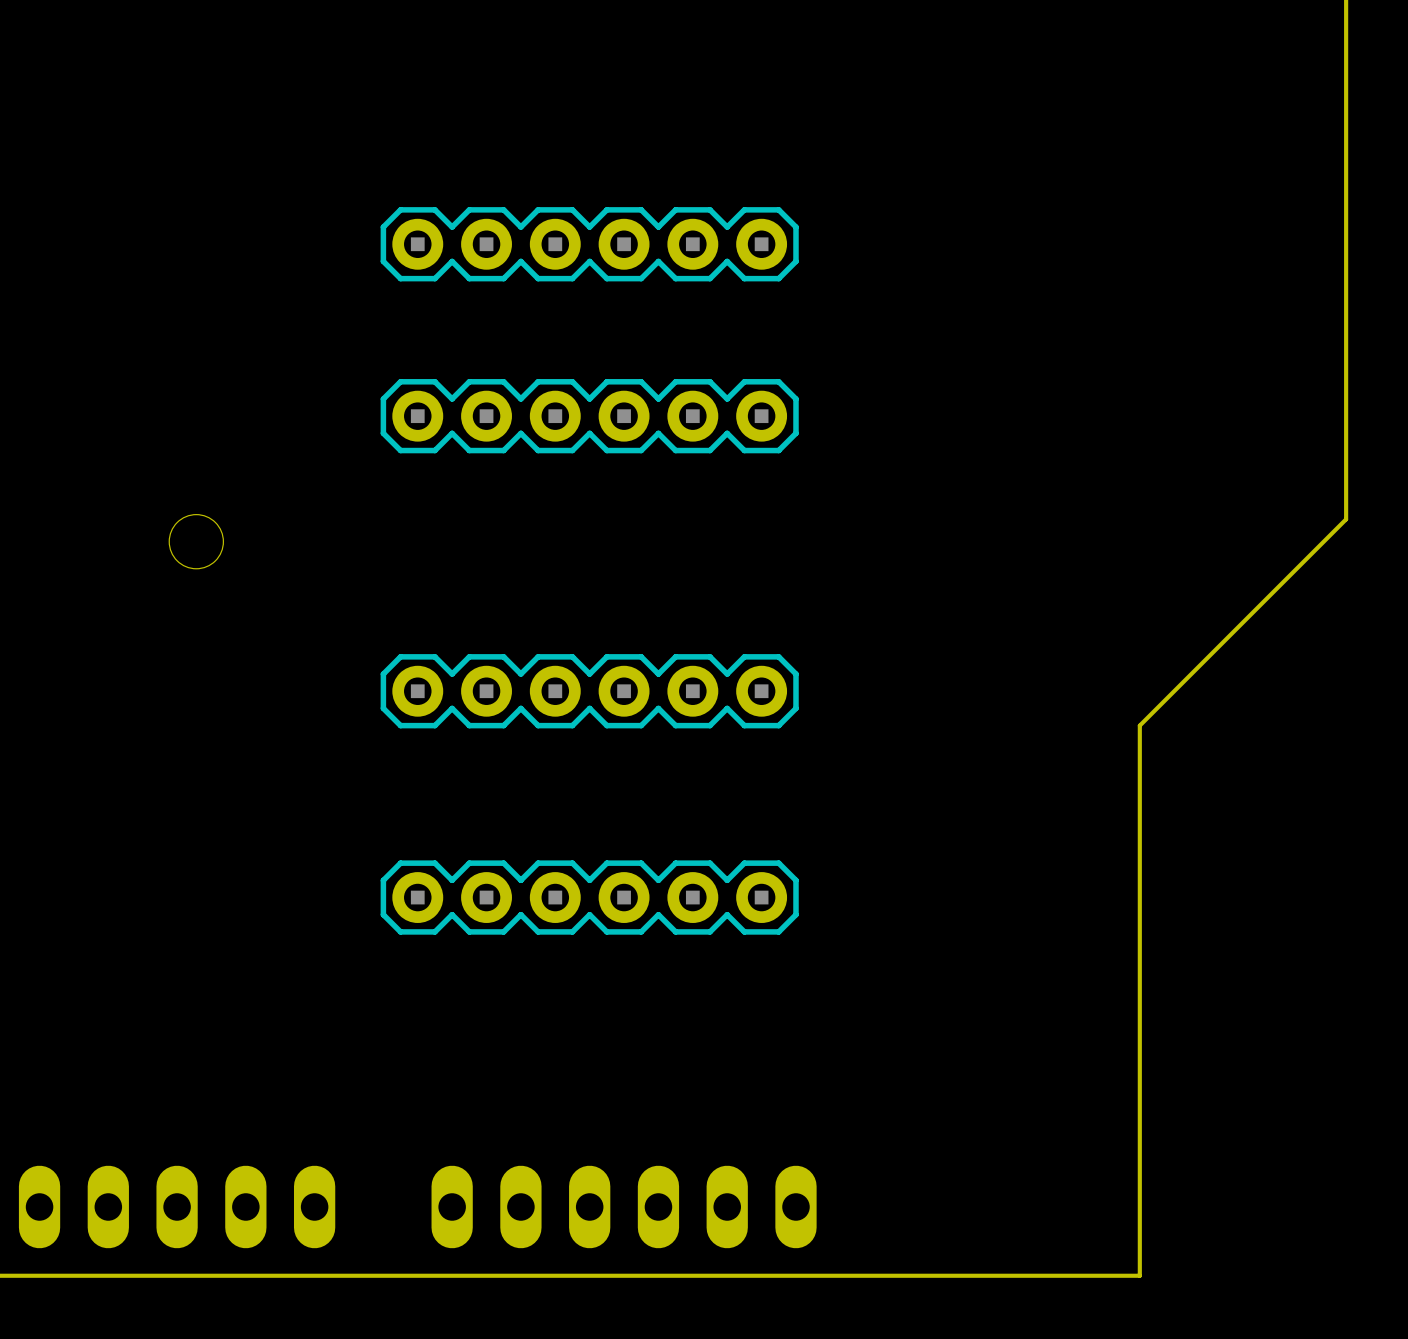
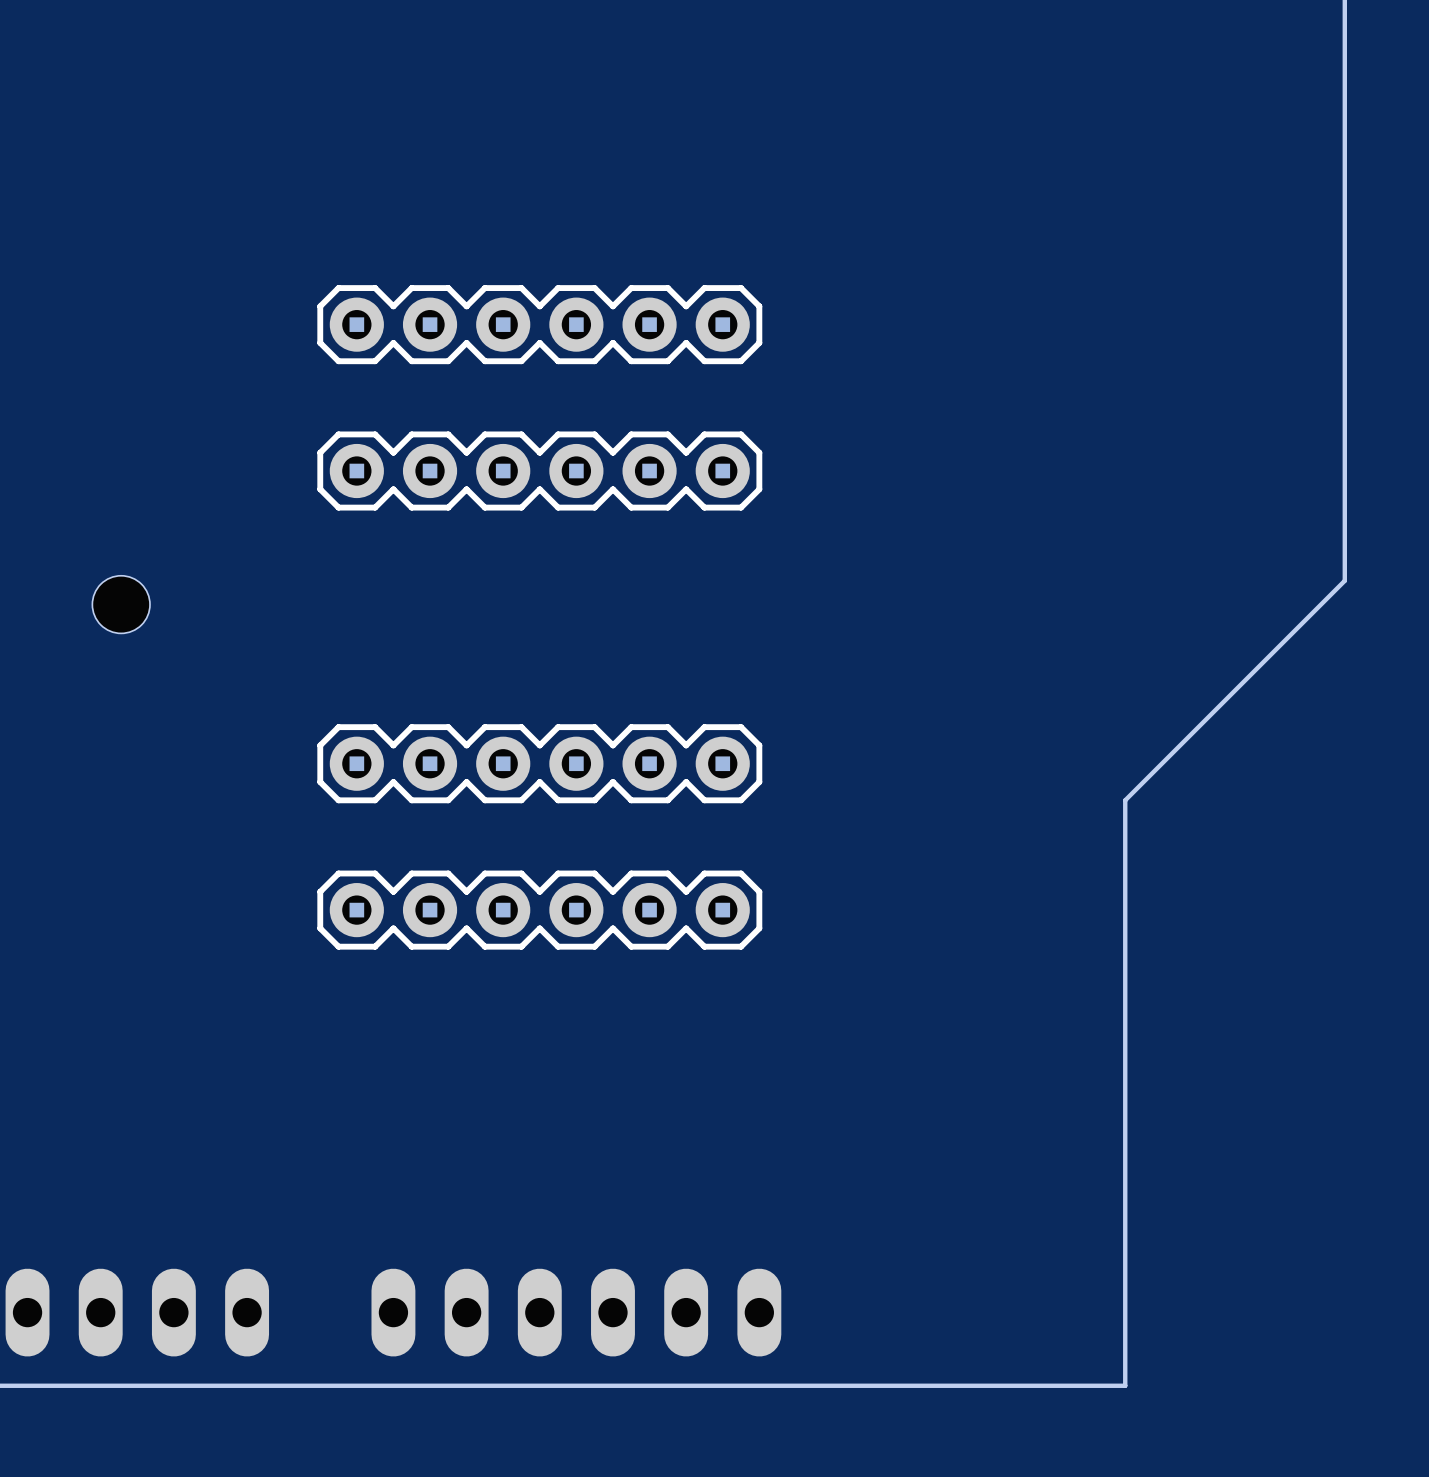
part position: (589, 244) -> (539, 324)
part position: (589, 897) -> (539, 910)

